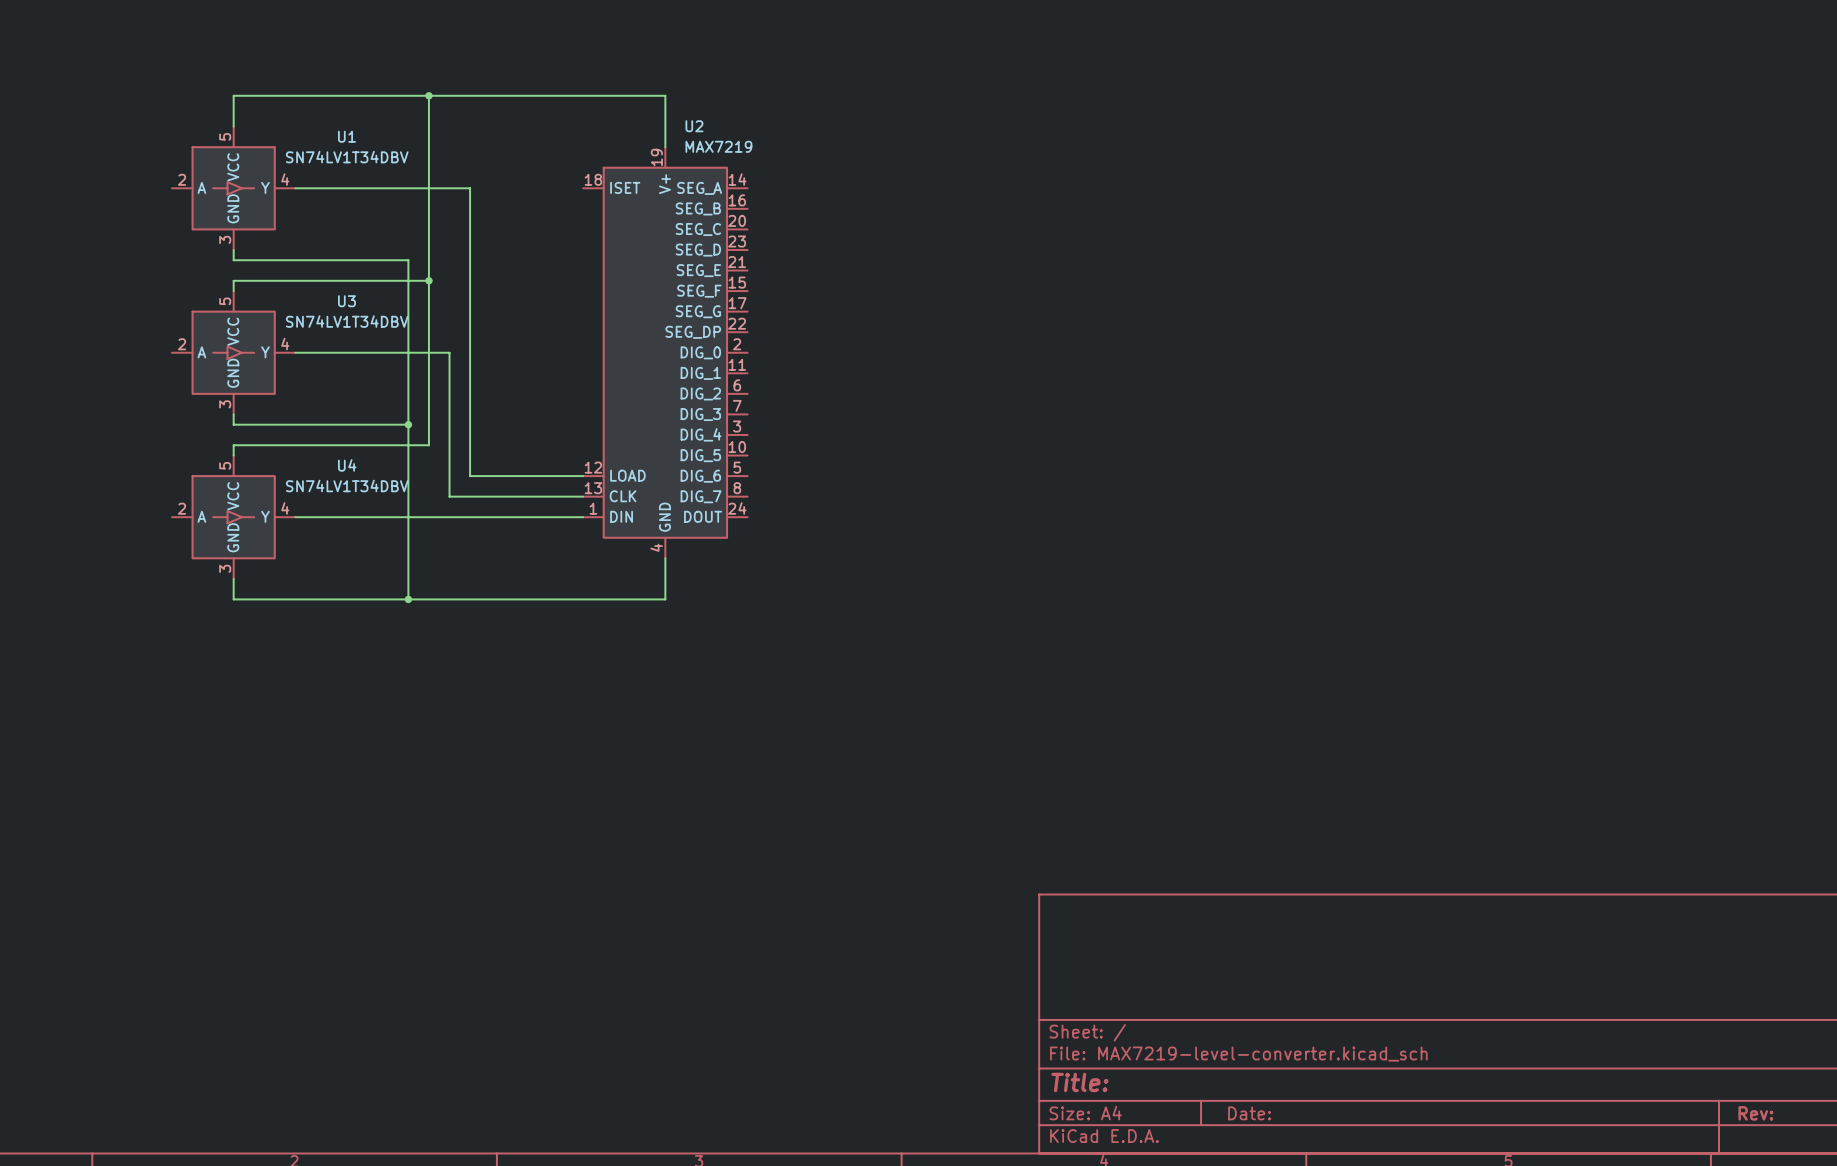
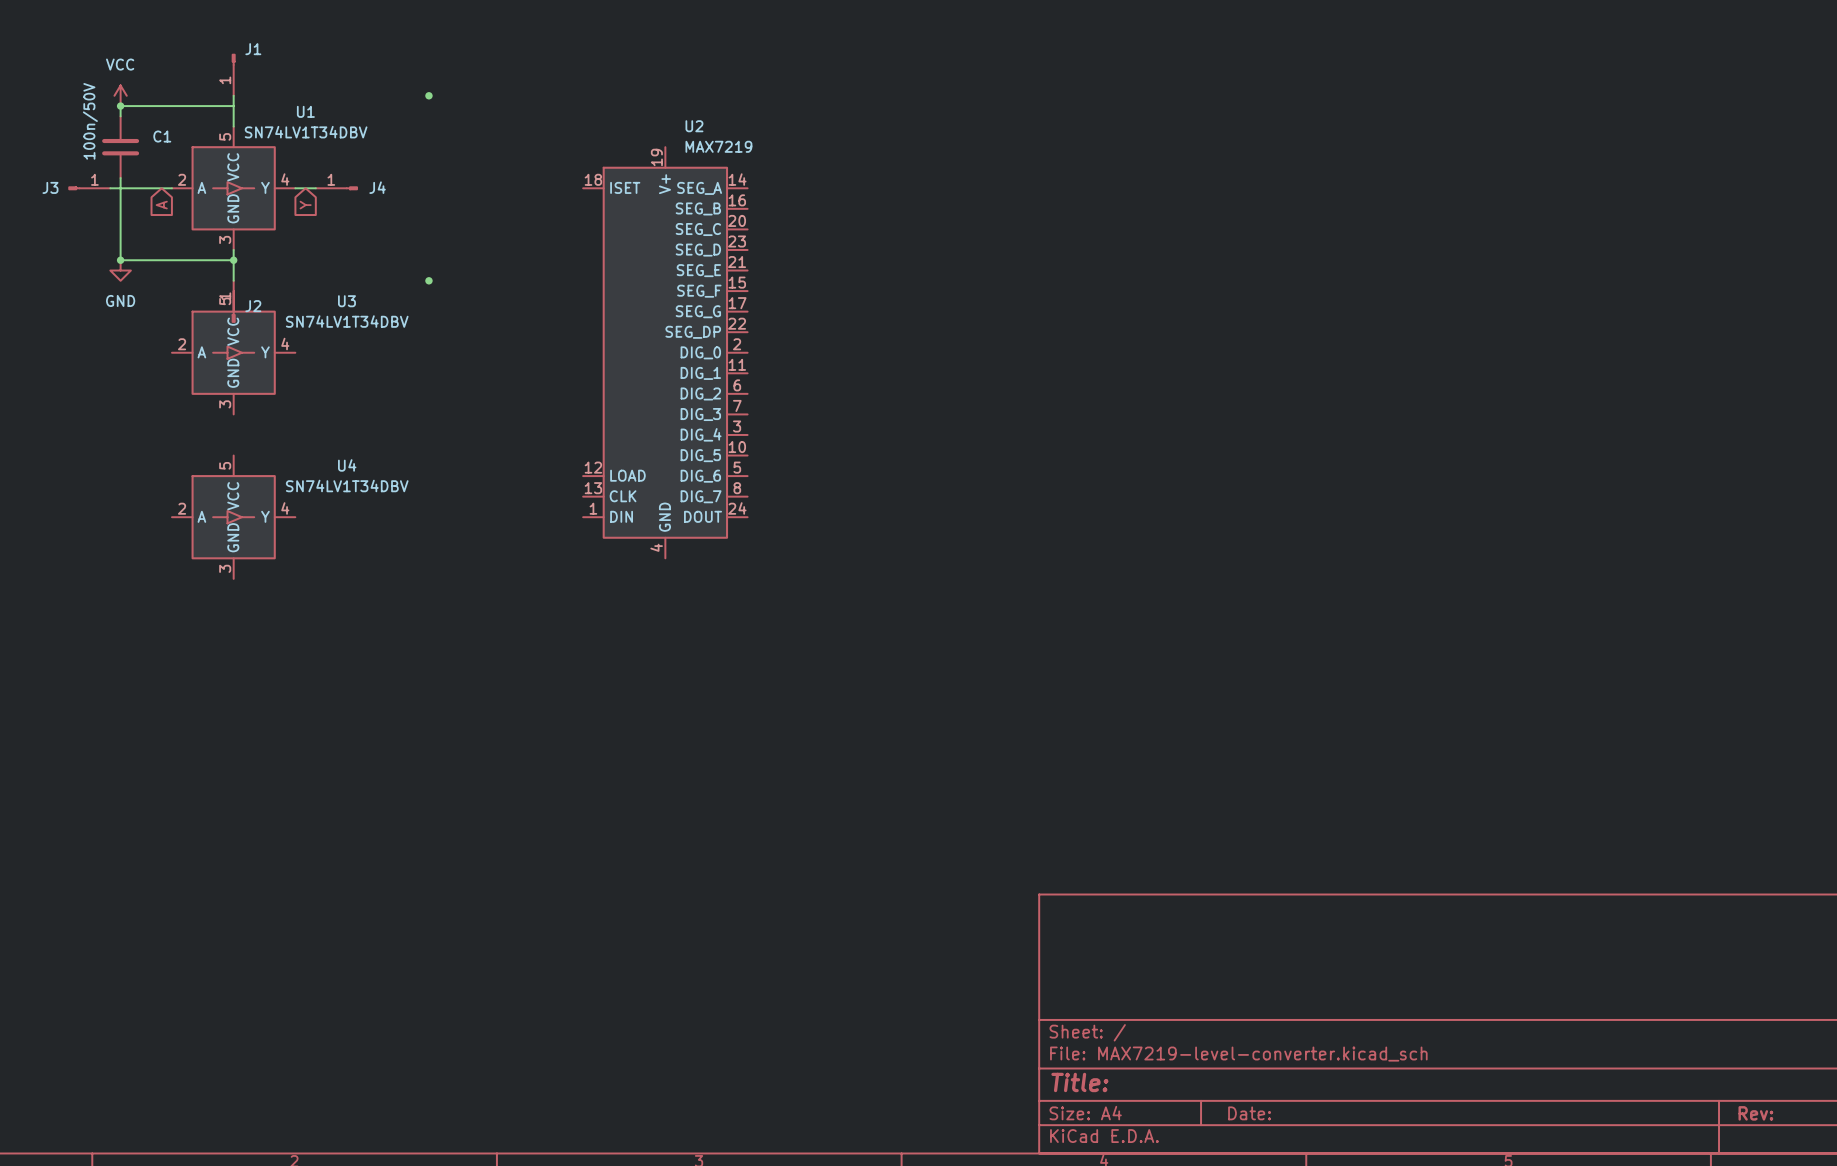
J1: none -> (233, 74)
power symbol: none -> VCC (120, 95)
wire: (233, 95) (665, 95) (665, 147) -> none
wire: (428, 95) (428, 445) (233, 445) (233, 455) -> none
junction: none -> (120, 106)
wire: none -> (233, 106) (120, 106) (120, 116)
U1 name position: U1 (346, 136) -> U1 (305, 111)
C1: none -> 100n/50V (120, 147)
U1 value position: SN74LV1T34DBV (347, 157) -> SN74LV1T34DBV (306, 132)
wire: none -> (120, 178) (120, 260) (233, 260) (233, 280)
J3: none -> (89, 188)
wire: none -> (110, 188) (172, 188)
wire: (315, 188) (470, 188) (470, 476) (583, 476) -> none
J4: none -> (336, 188)
global label: none -> A (161, 205)
global label: none -> Y (305, 205)
junction: none -> (120, 260)
wire: (233, 260) (408, 260) (408, 599) -> none
junction: none -> (233, 260)
power symbol: none -> GND (120, 270)
wire: (428, 280) (233, 280) (233, 291) -> none
J2: none -> (233, 301)
wire: (295, 352) (449, 352) (449, 496) (583, 496) -> none
wire: (233, 414) (233, 424) (408, 424) -> none
junction: (408, 424) -> none
wire: (295, 517) (583, 517) -> none
wire: (665, 558) (665, 599) (233, 599) (233, 578) -> none
junction: (408, 599) -> none

